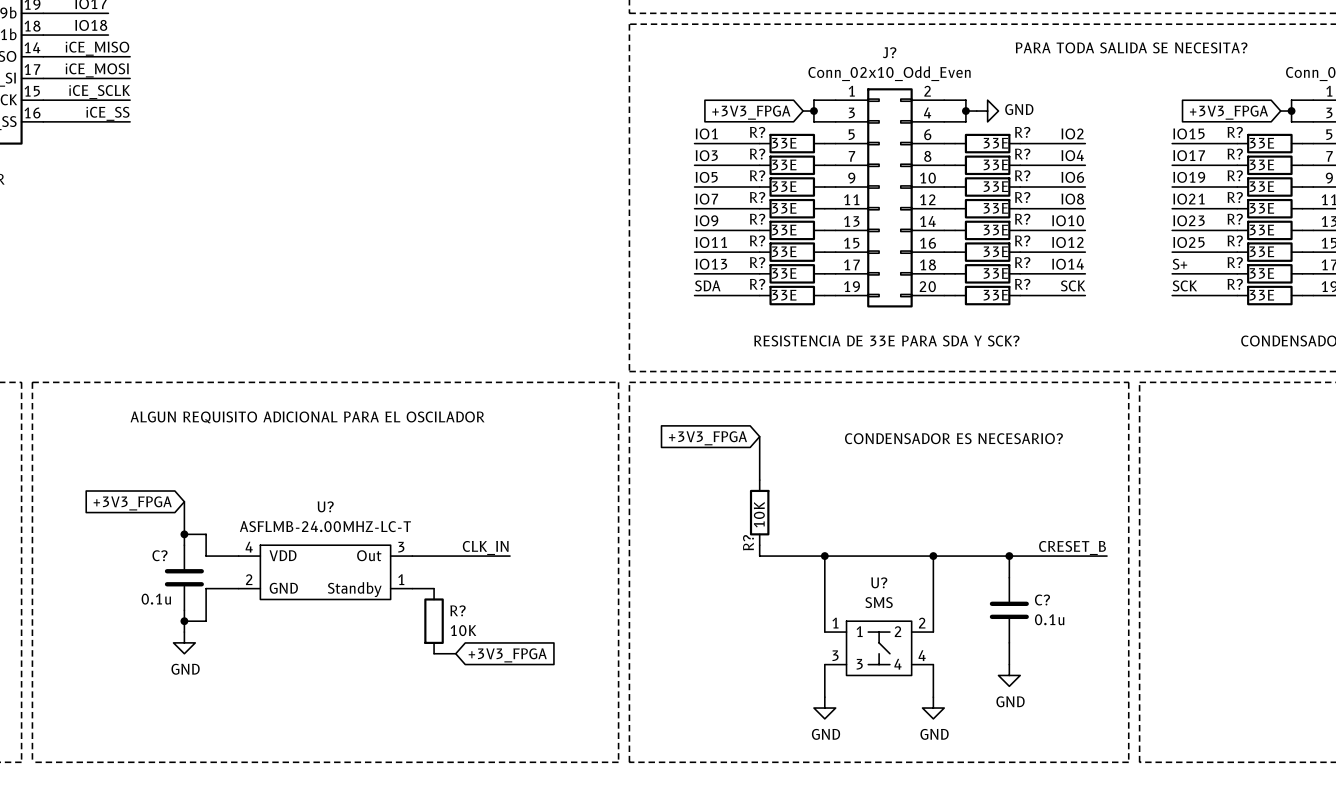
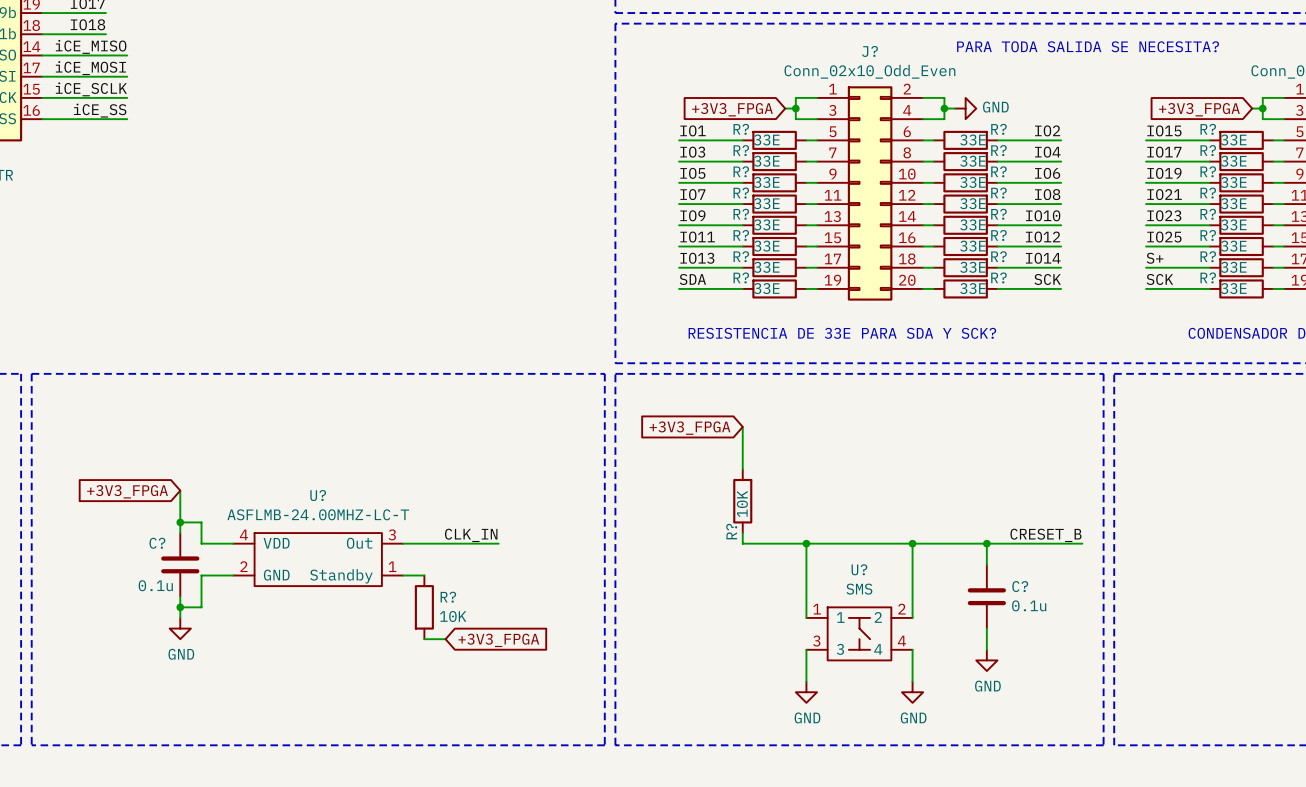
text: ALGUN REQUISITO ADICIONAL PARA EL OSCILADOR (307, 417) -> none
text: CONDENSADOR ES NECESARIO? (953, 438) -> none

